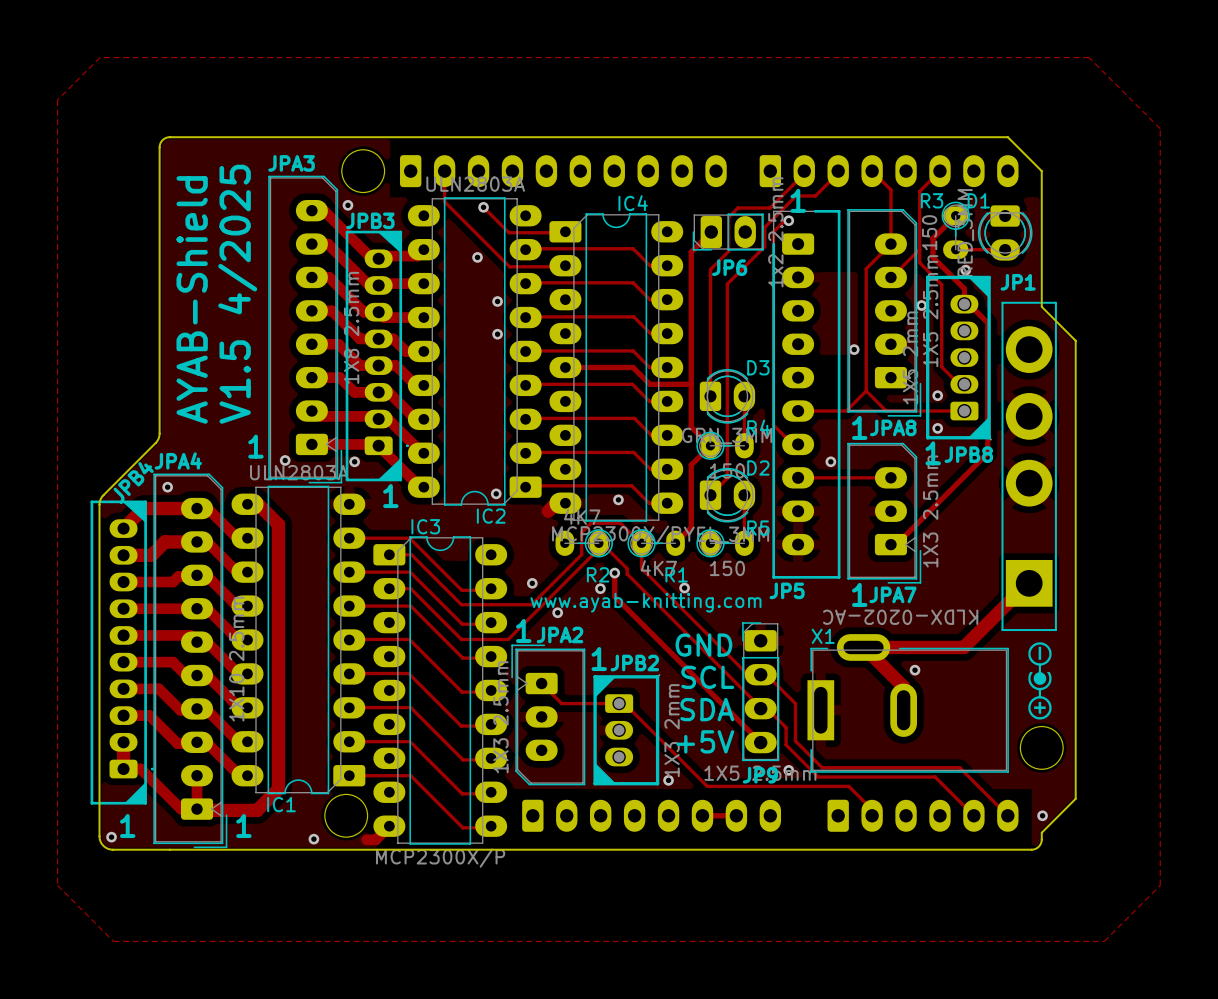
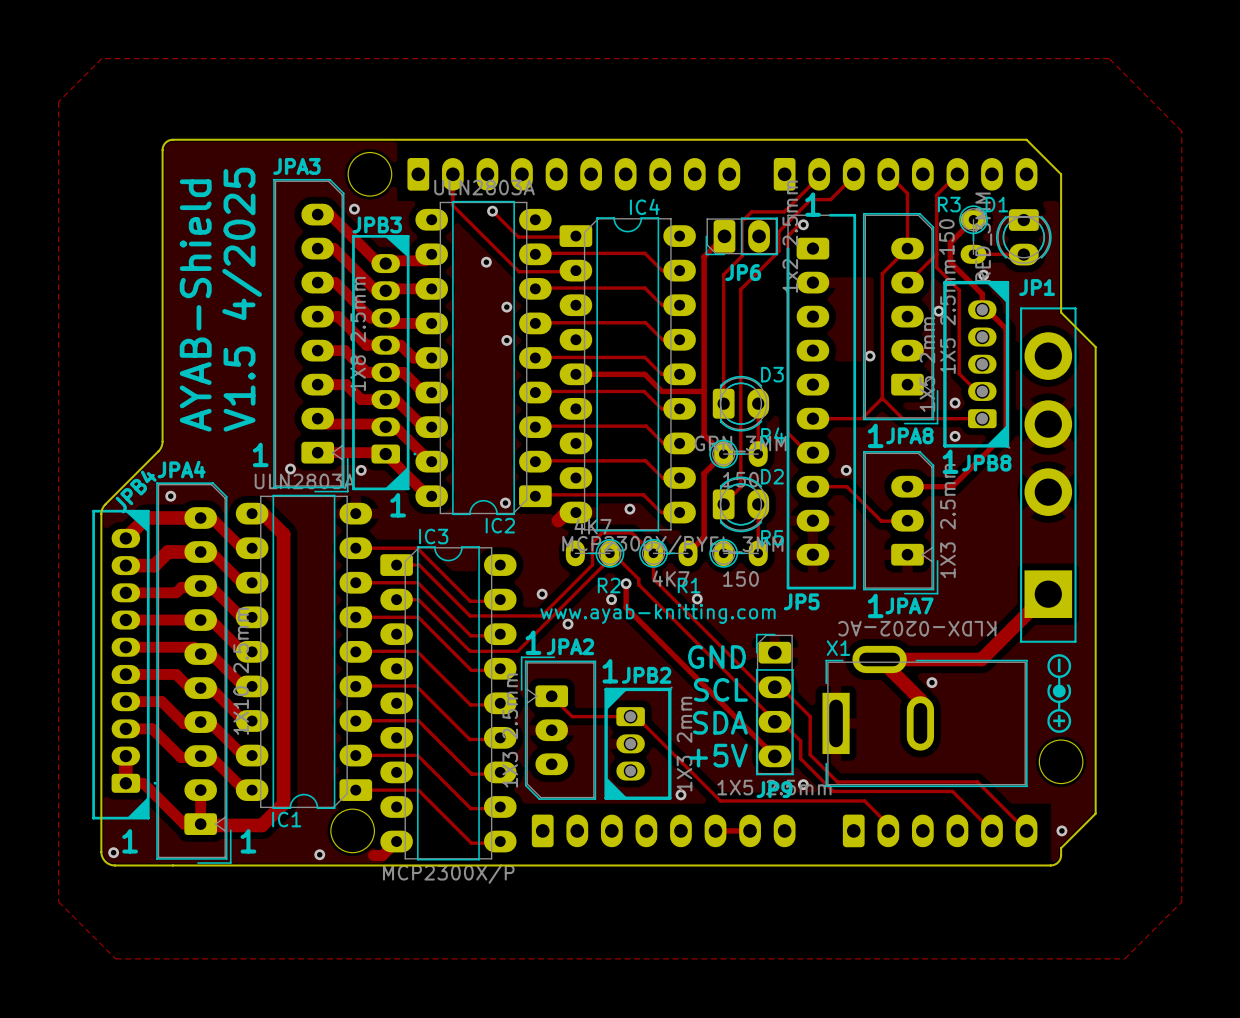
track: (987, 425) (987, 453) (896, 544) (890, 544) -> (1006, 432) (952, 486) (907, 486)
track: (831, 477) (890, 477) -> (846, 486) (881, 521) (909, 521)

